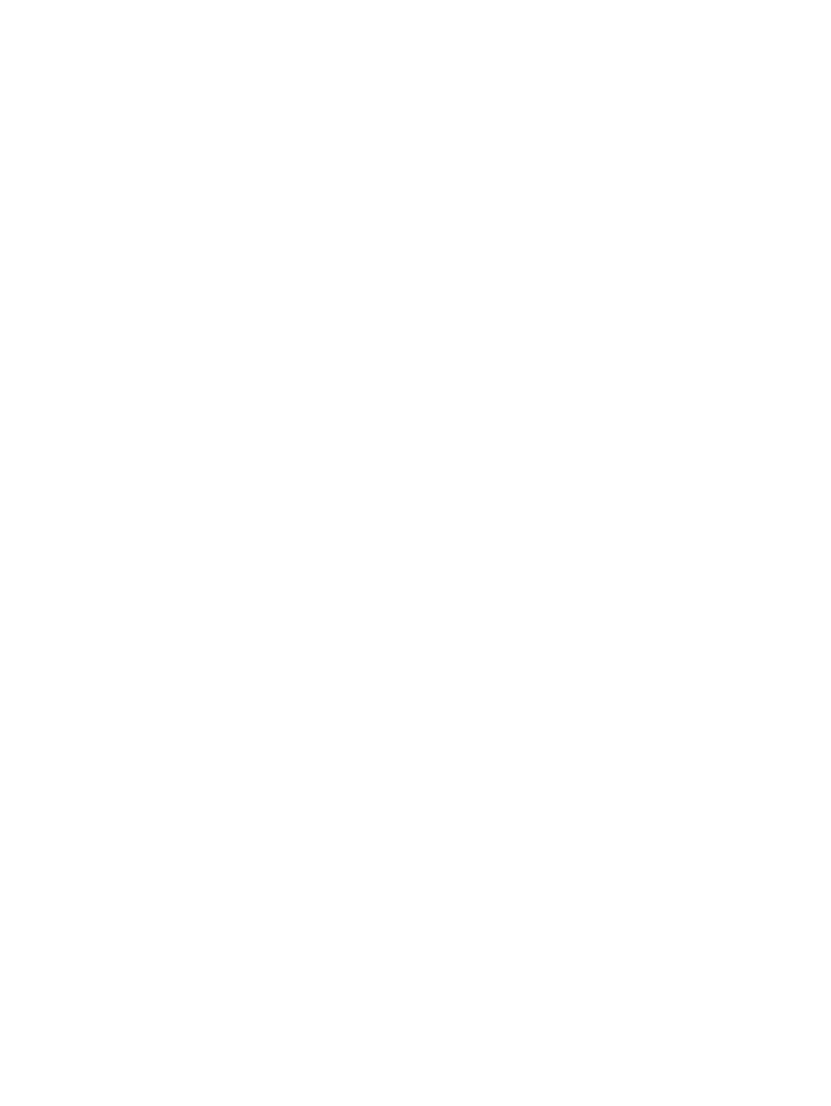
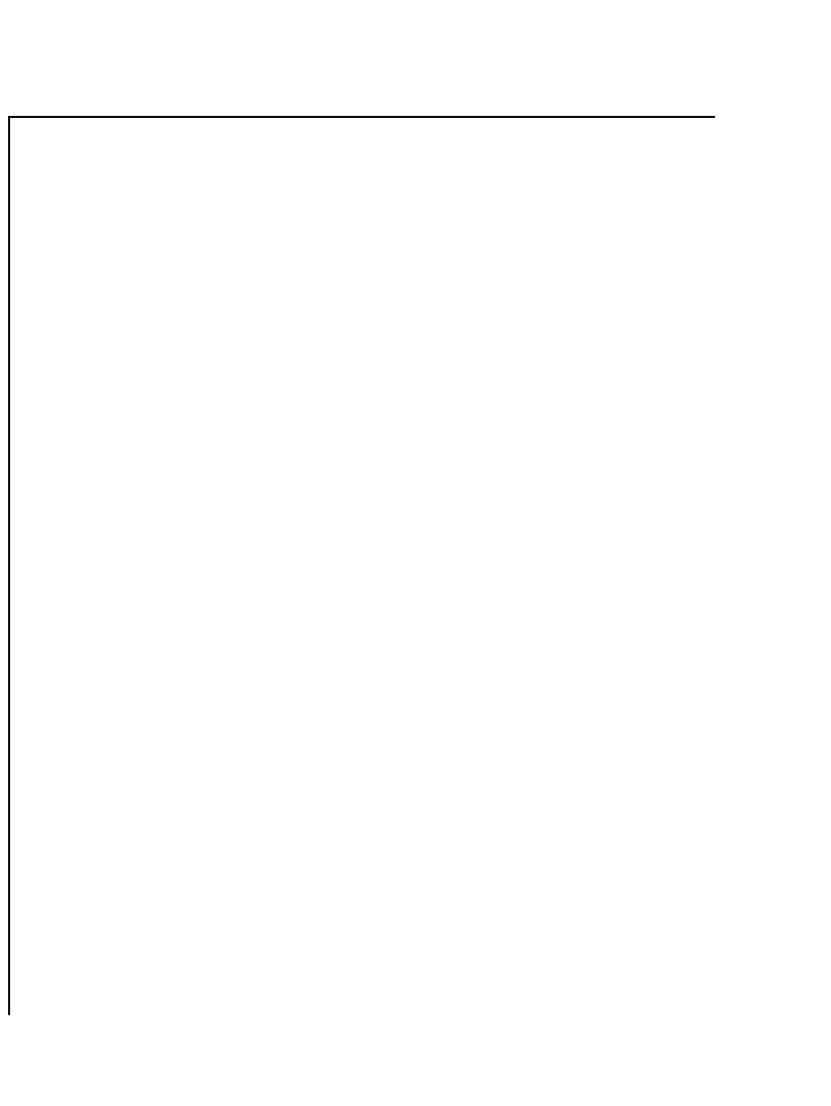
wire: none -> (714, 116) (9, 116) (9, 1014)

